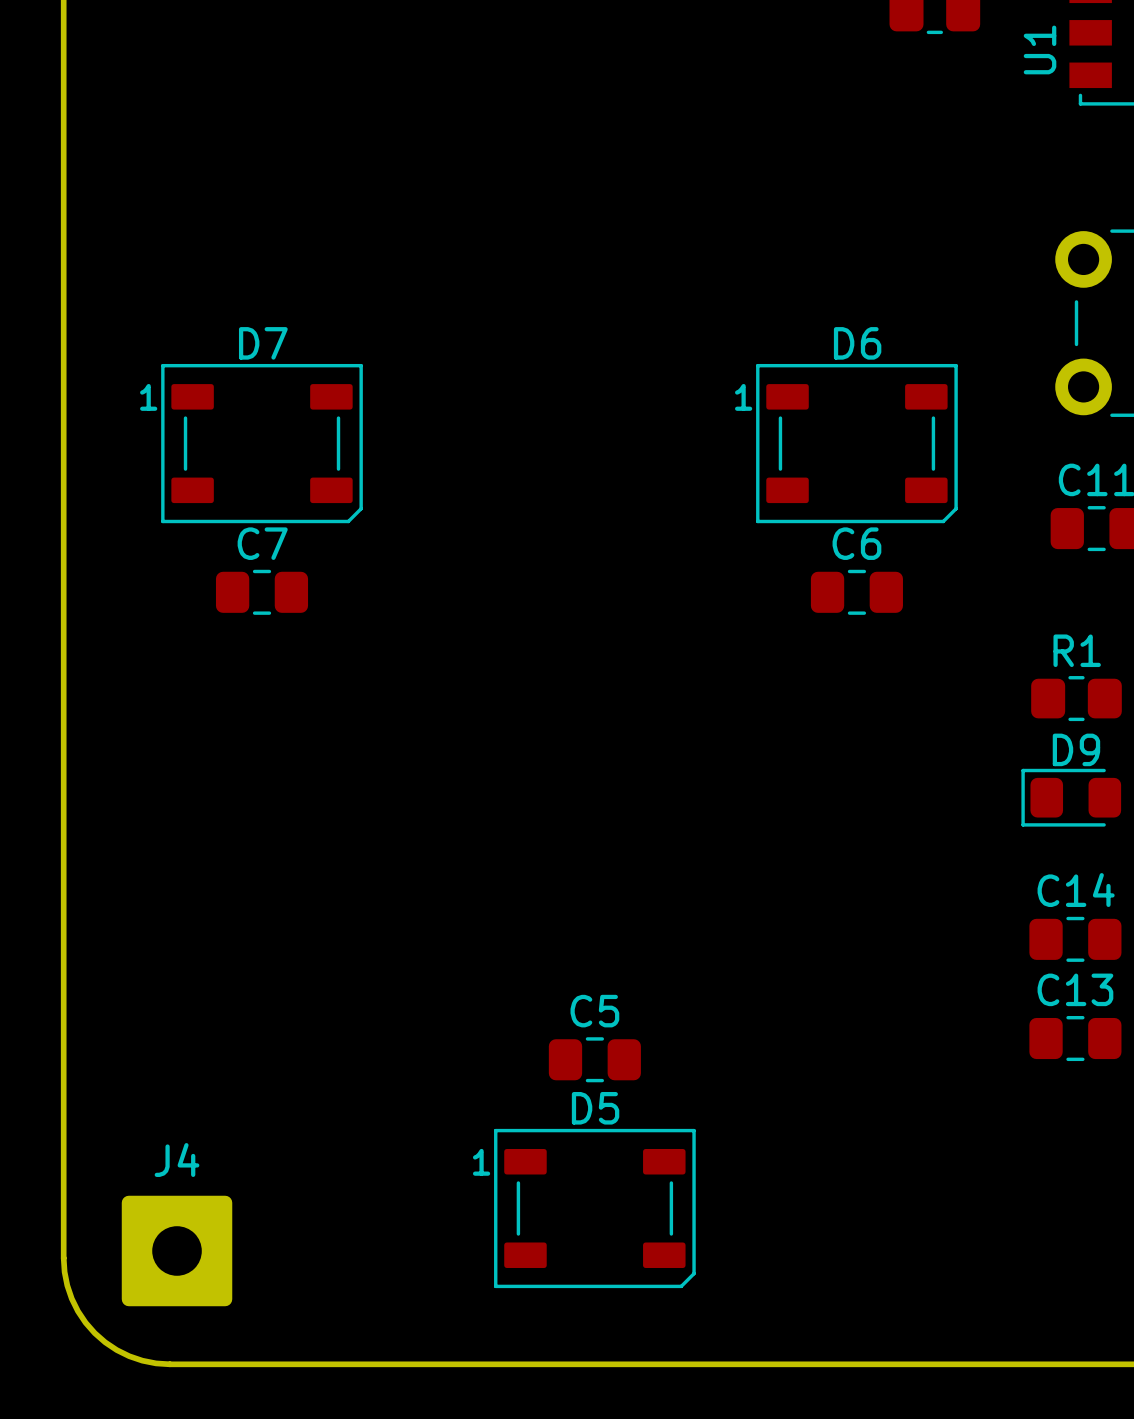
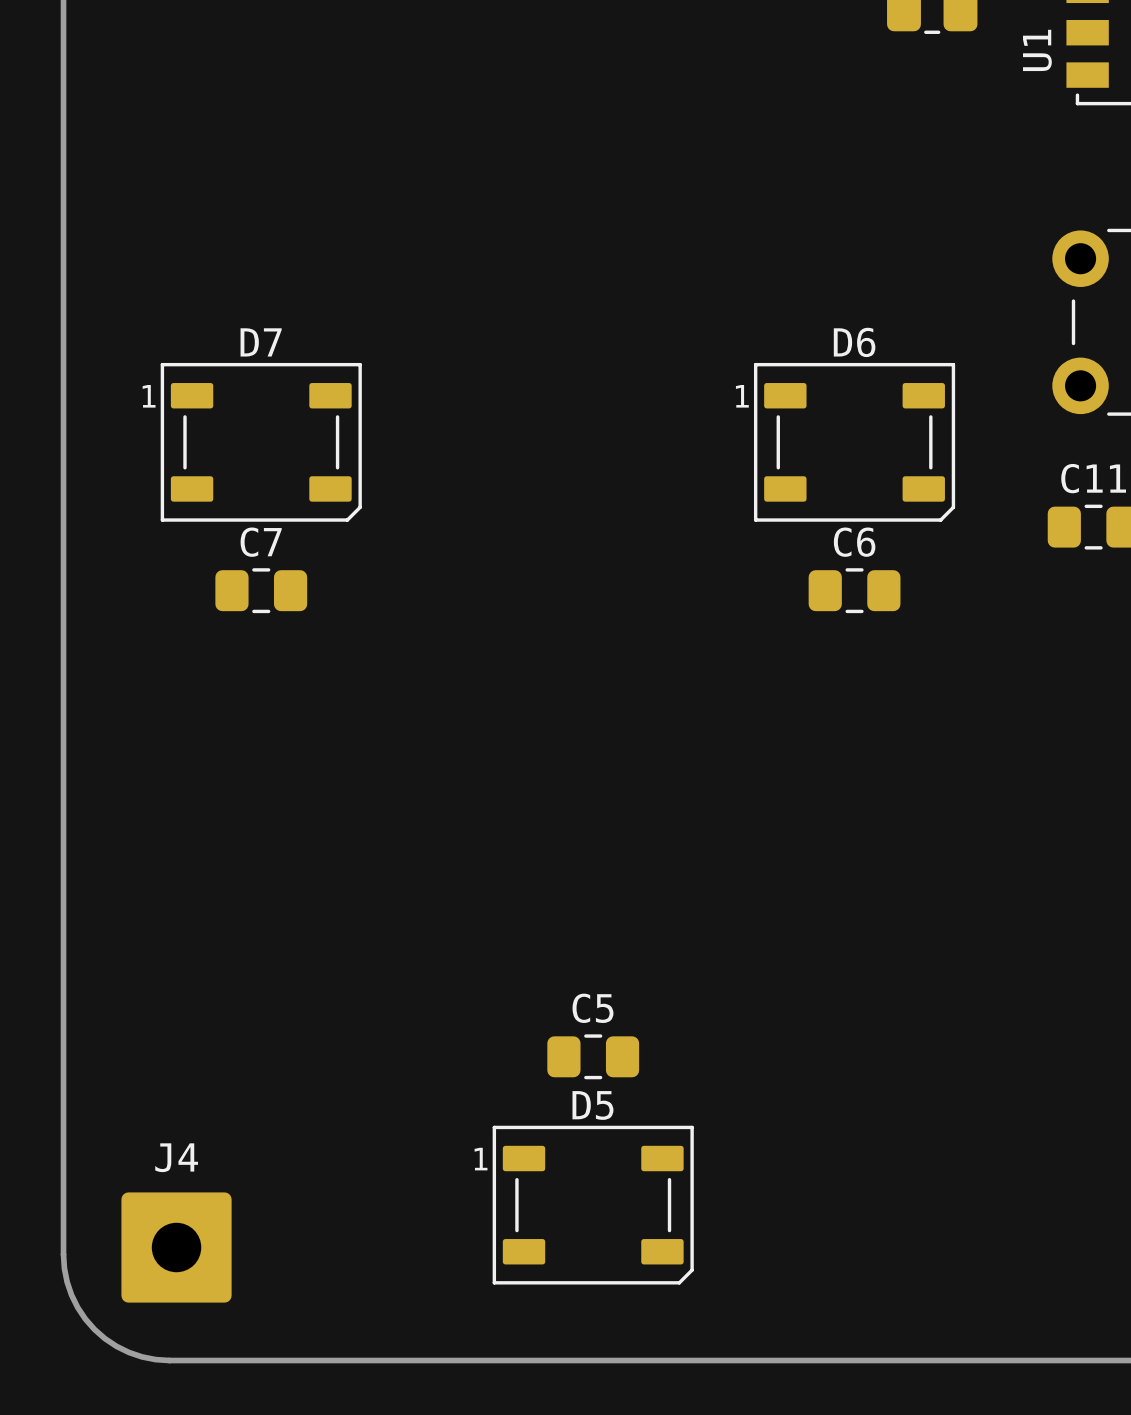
R1: (1076, 698) -> none
D9: (1071, 797) -> none
C14: (1075, 939) -> none
C13: (1075, 1038) -> none

